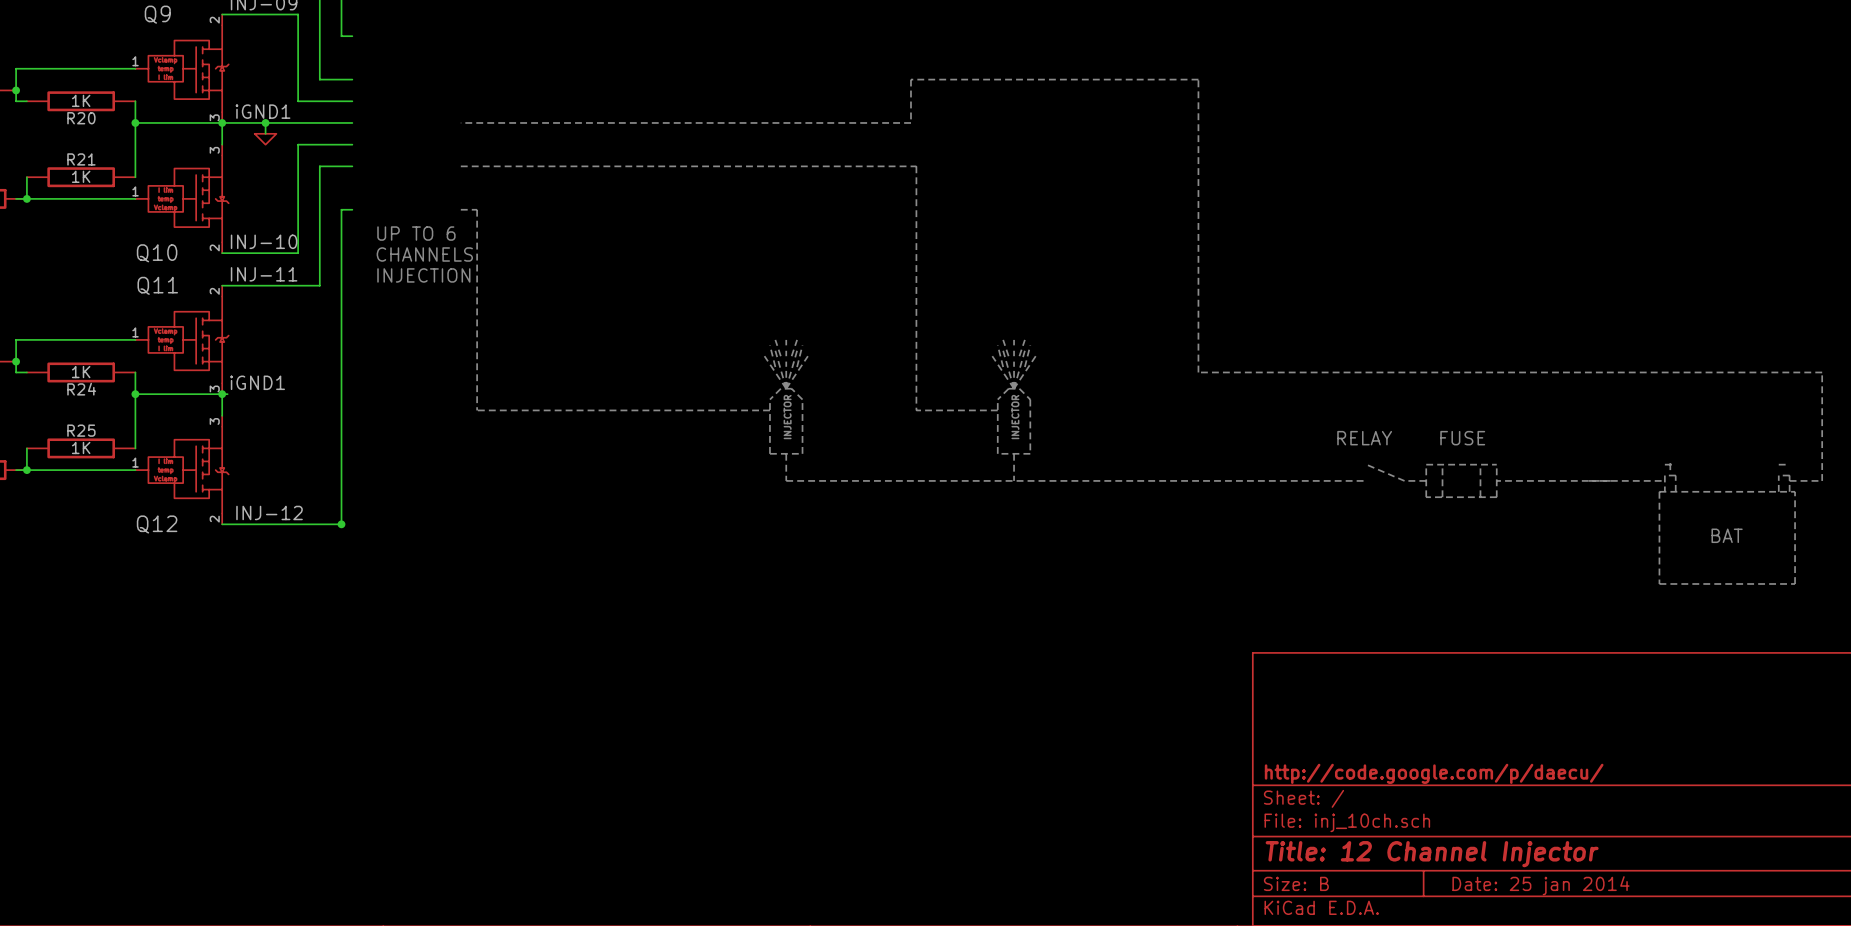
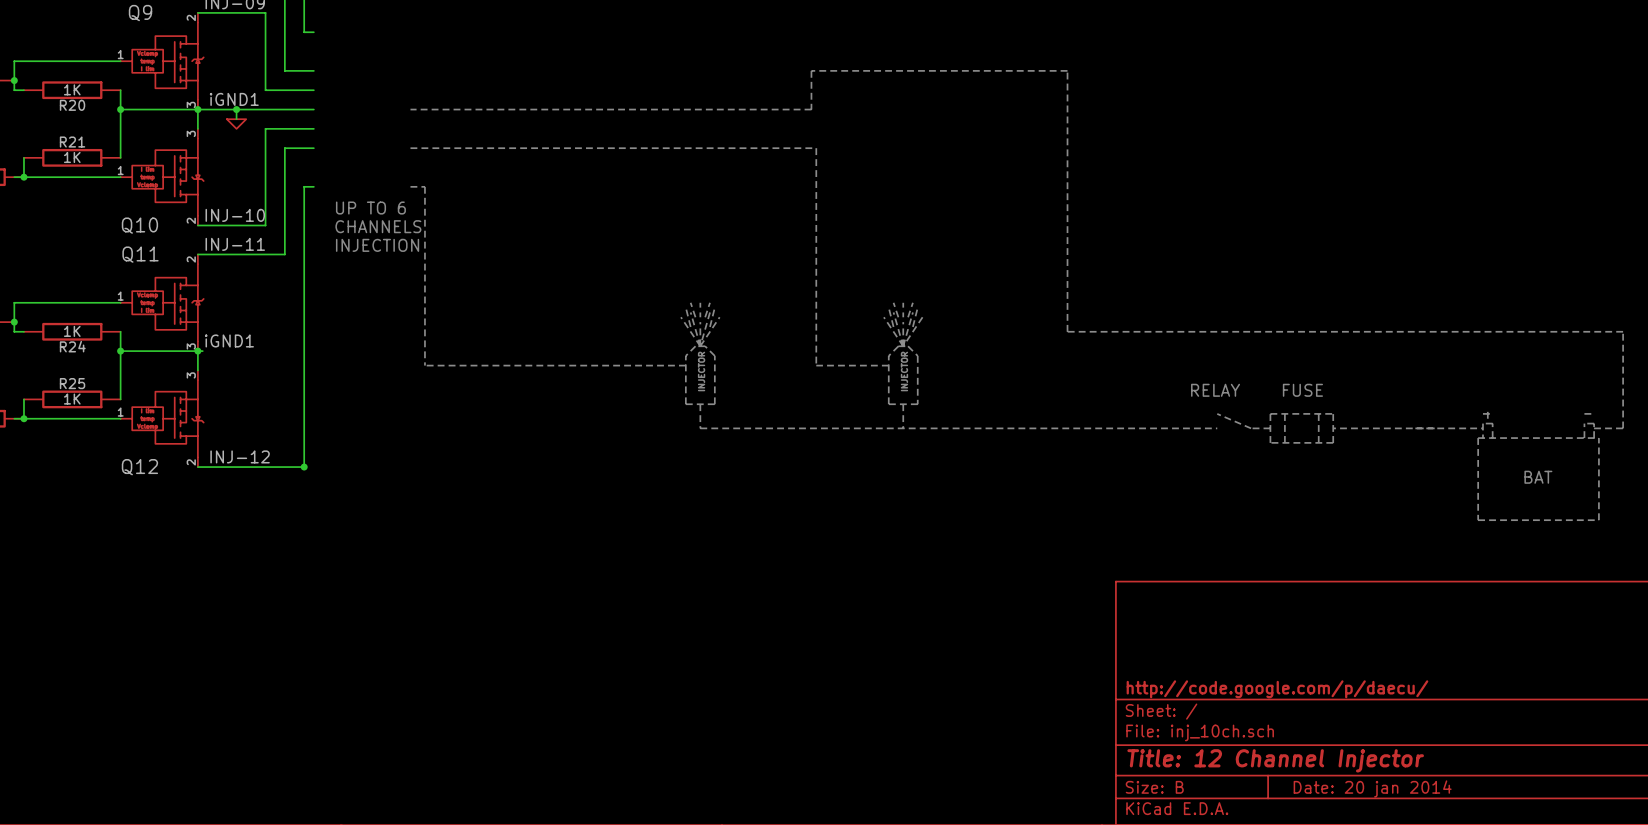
title block: Date: 25 jan 2014 (1541, 885) -> Date: 20 jan 2014 (1372, 788)

